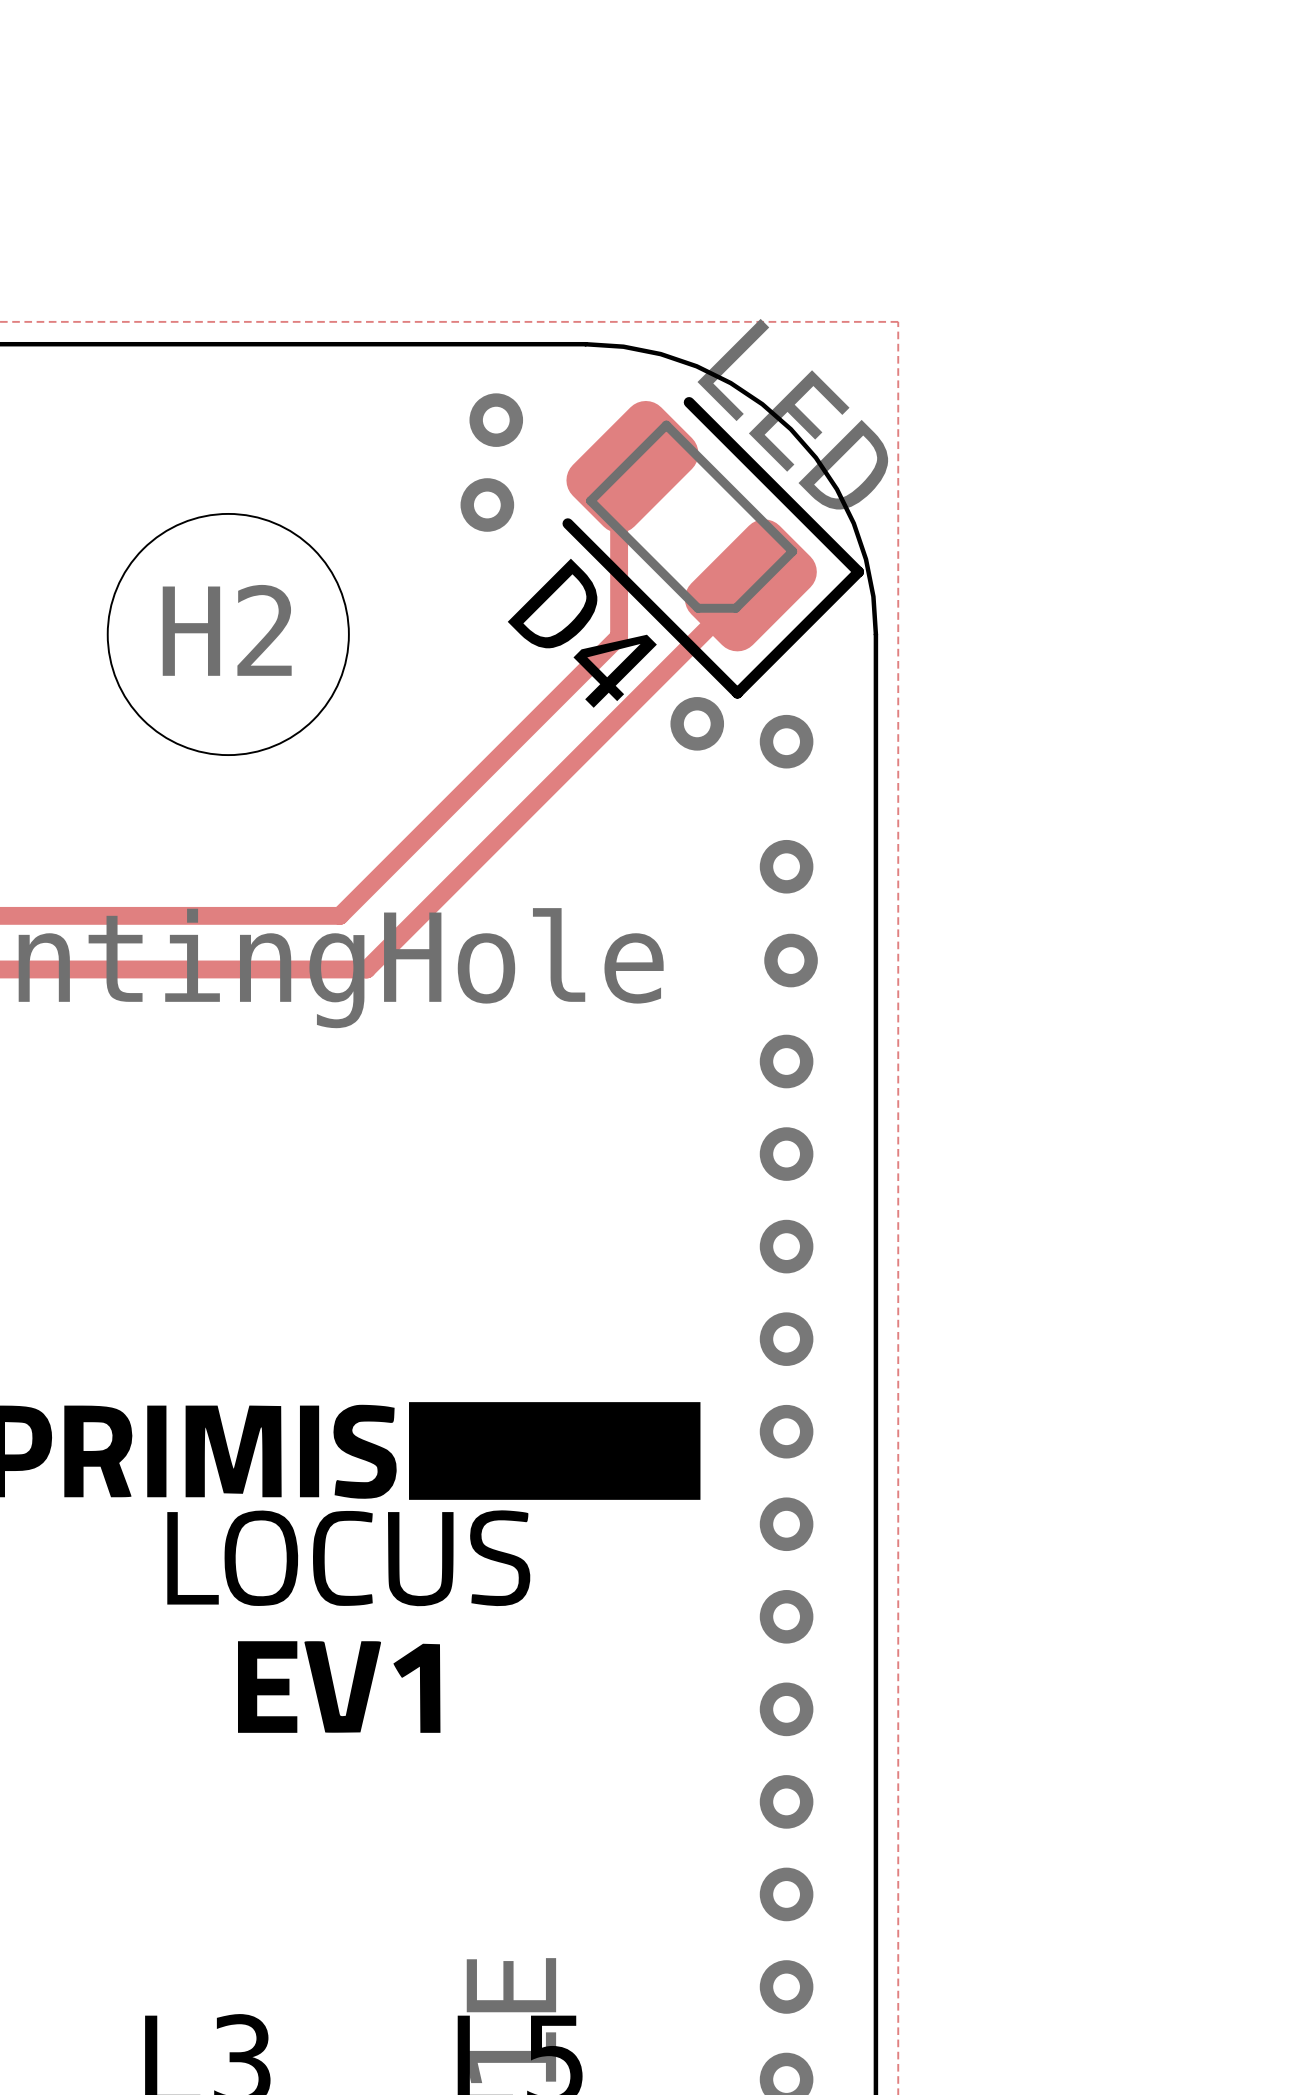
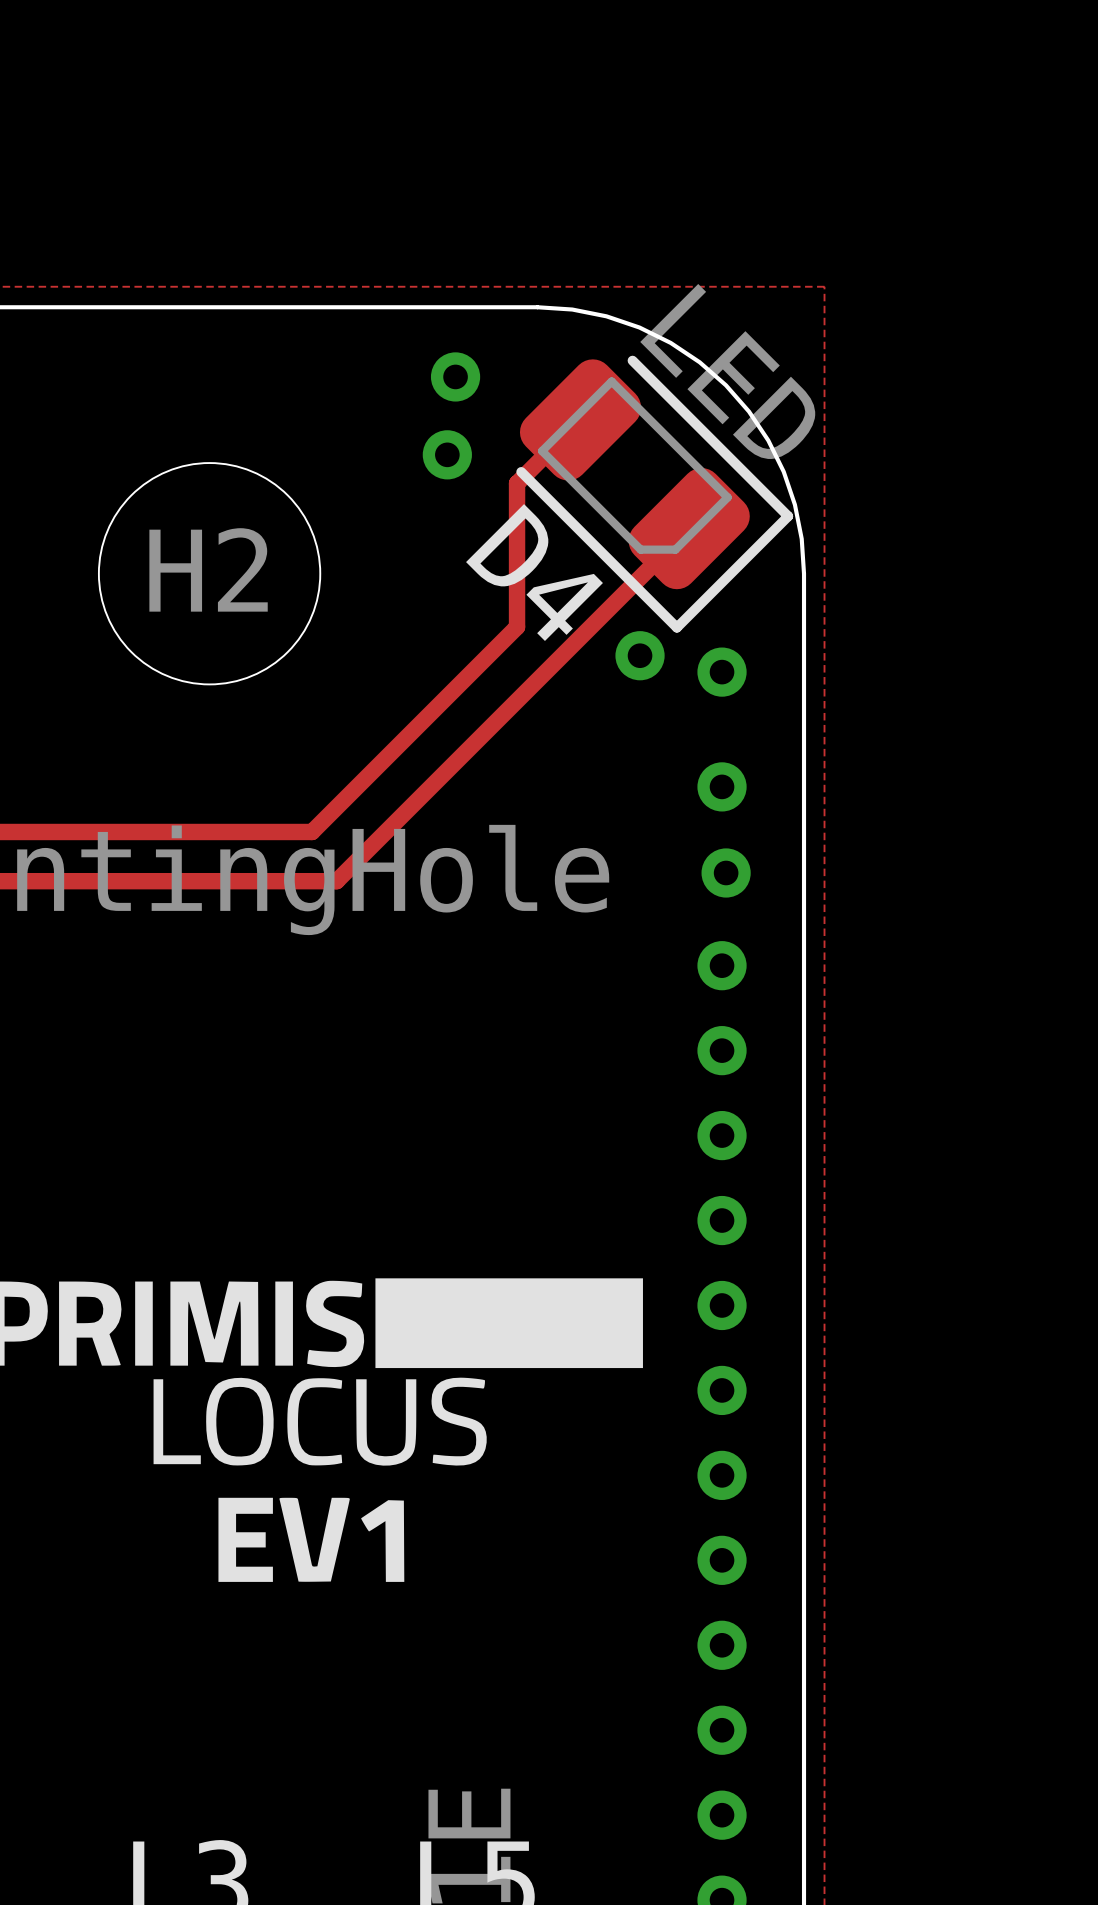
track: (619, 480) (619, 636) (563, 692) -> (568, 432) (517, 483) (517, 627)

